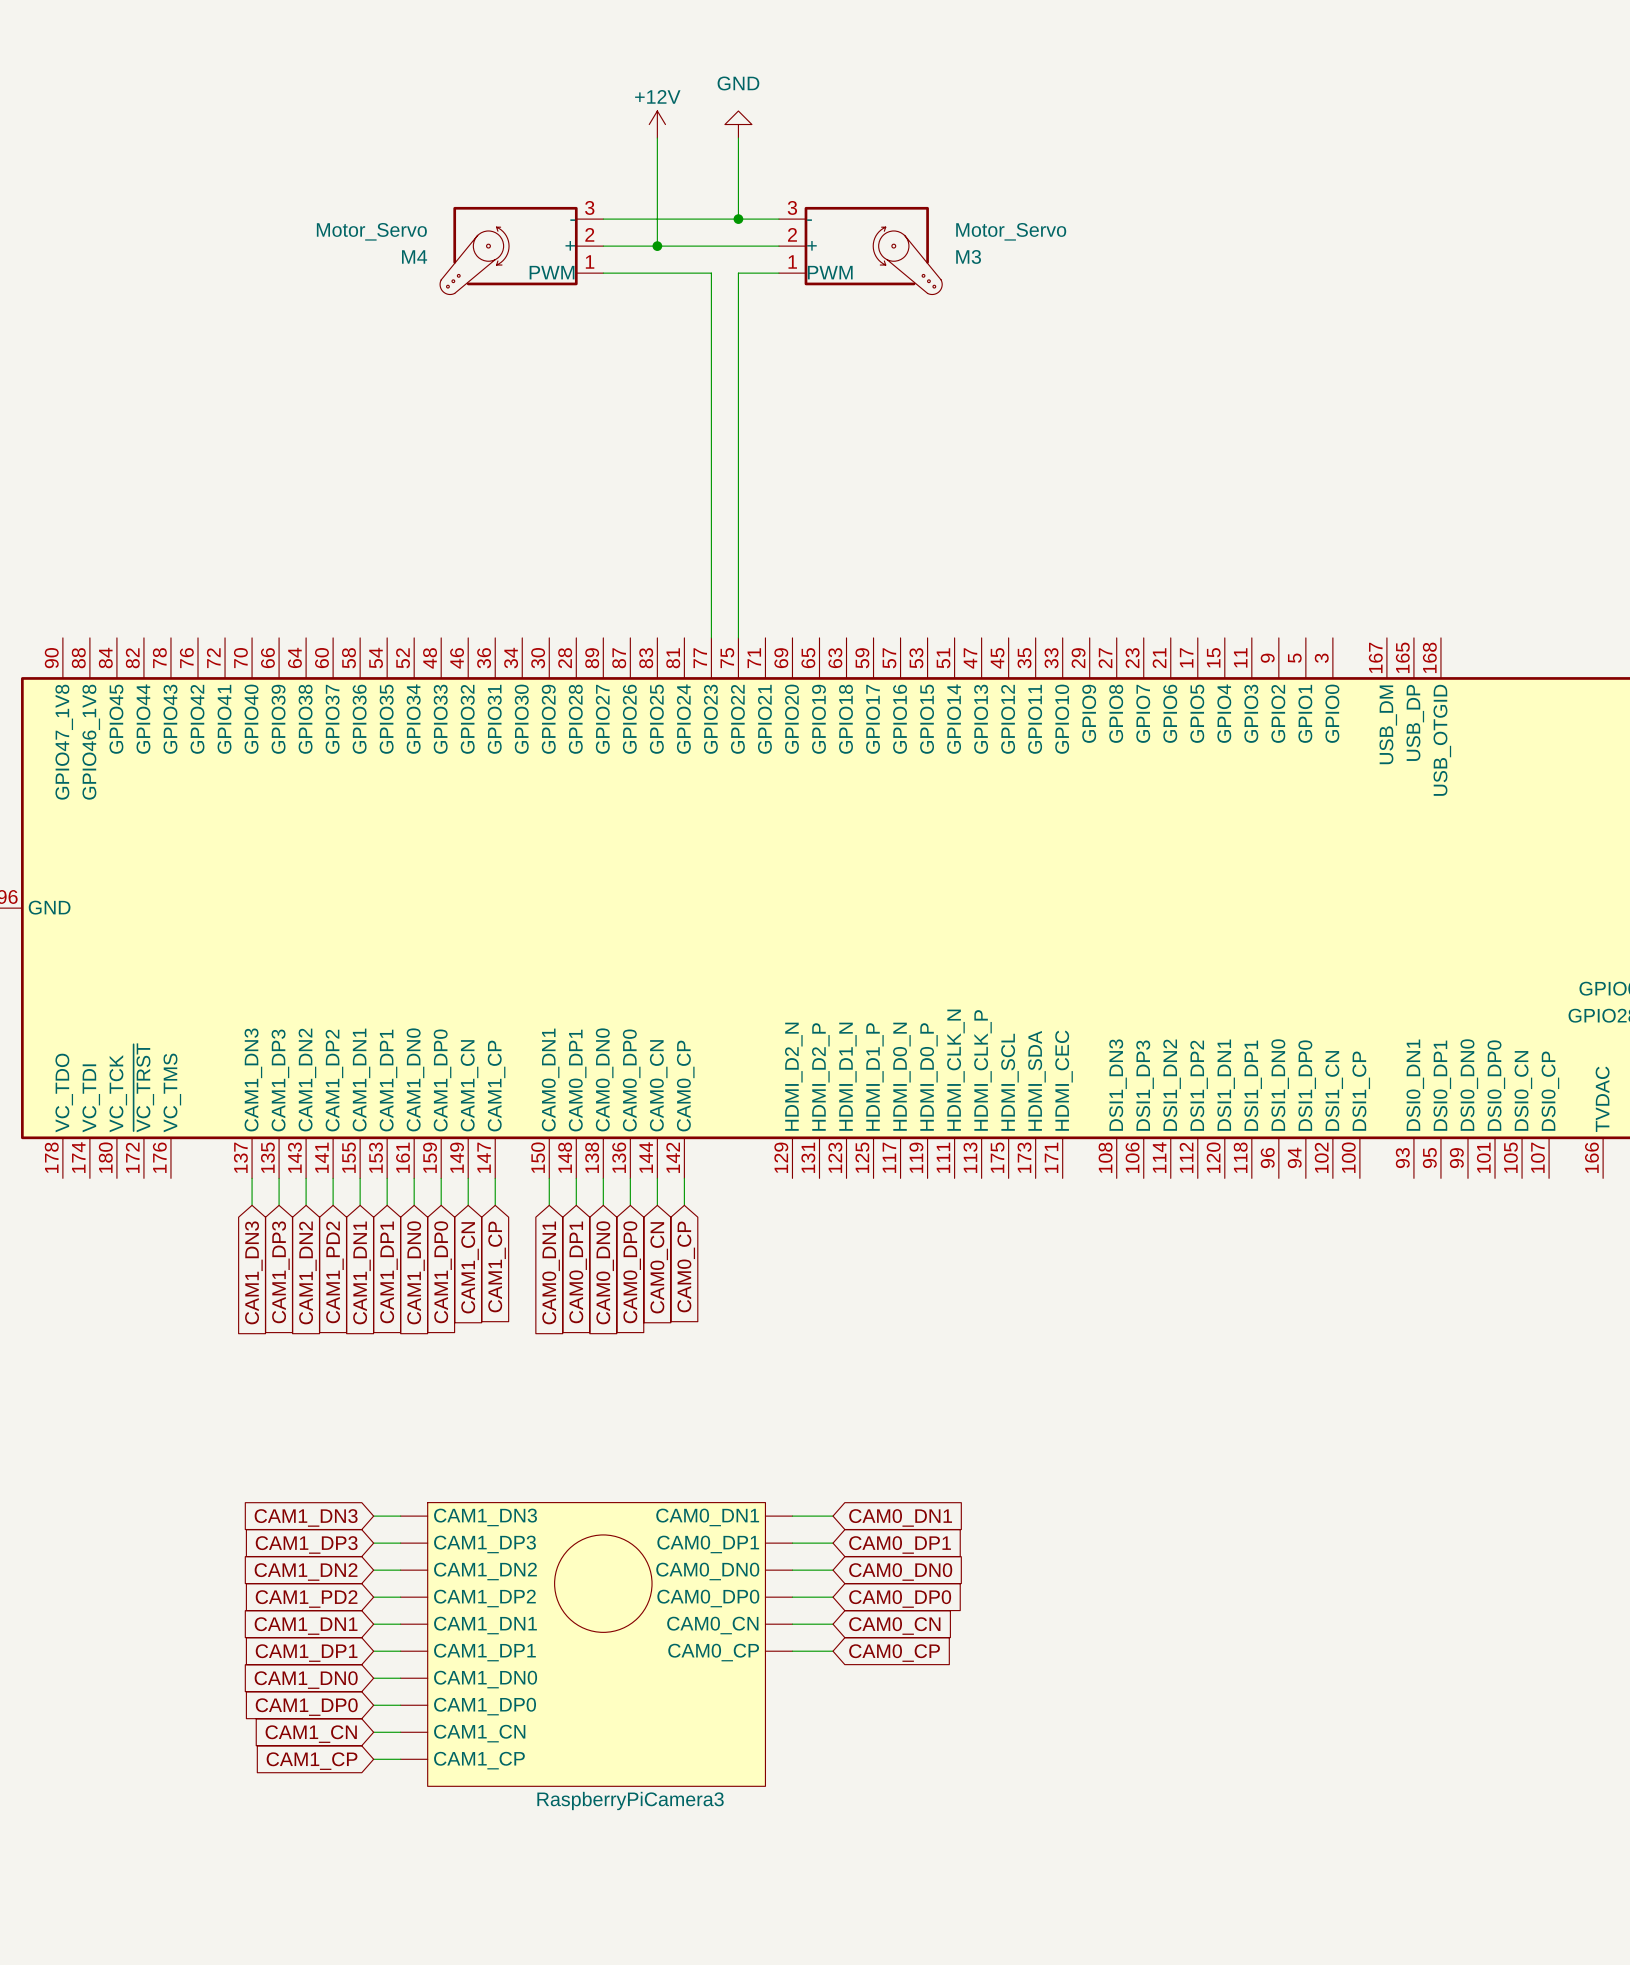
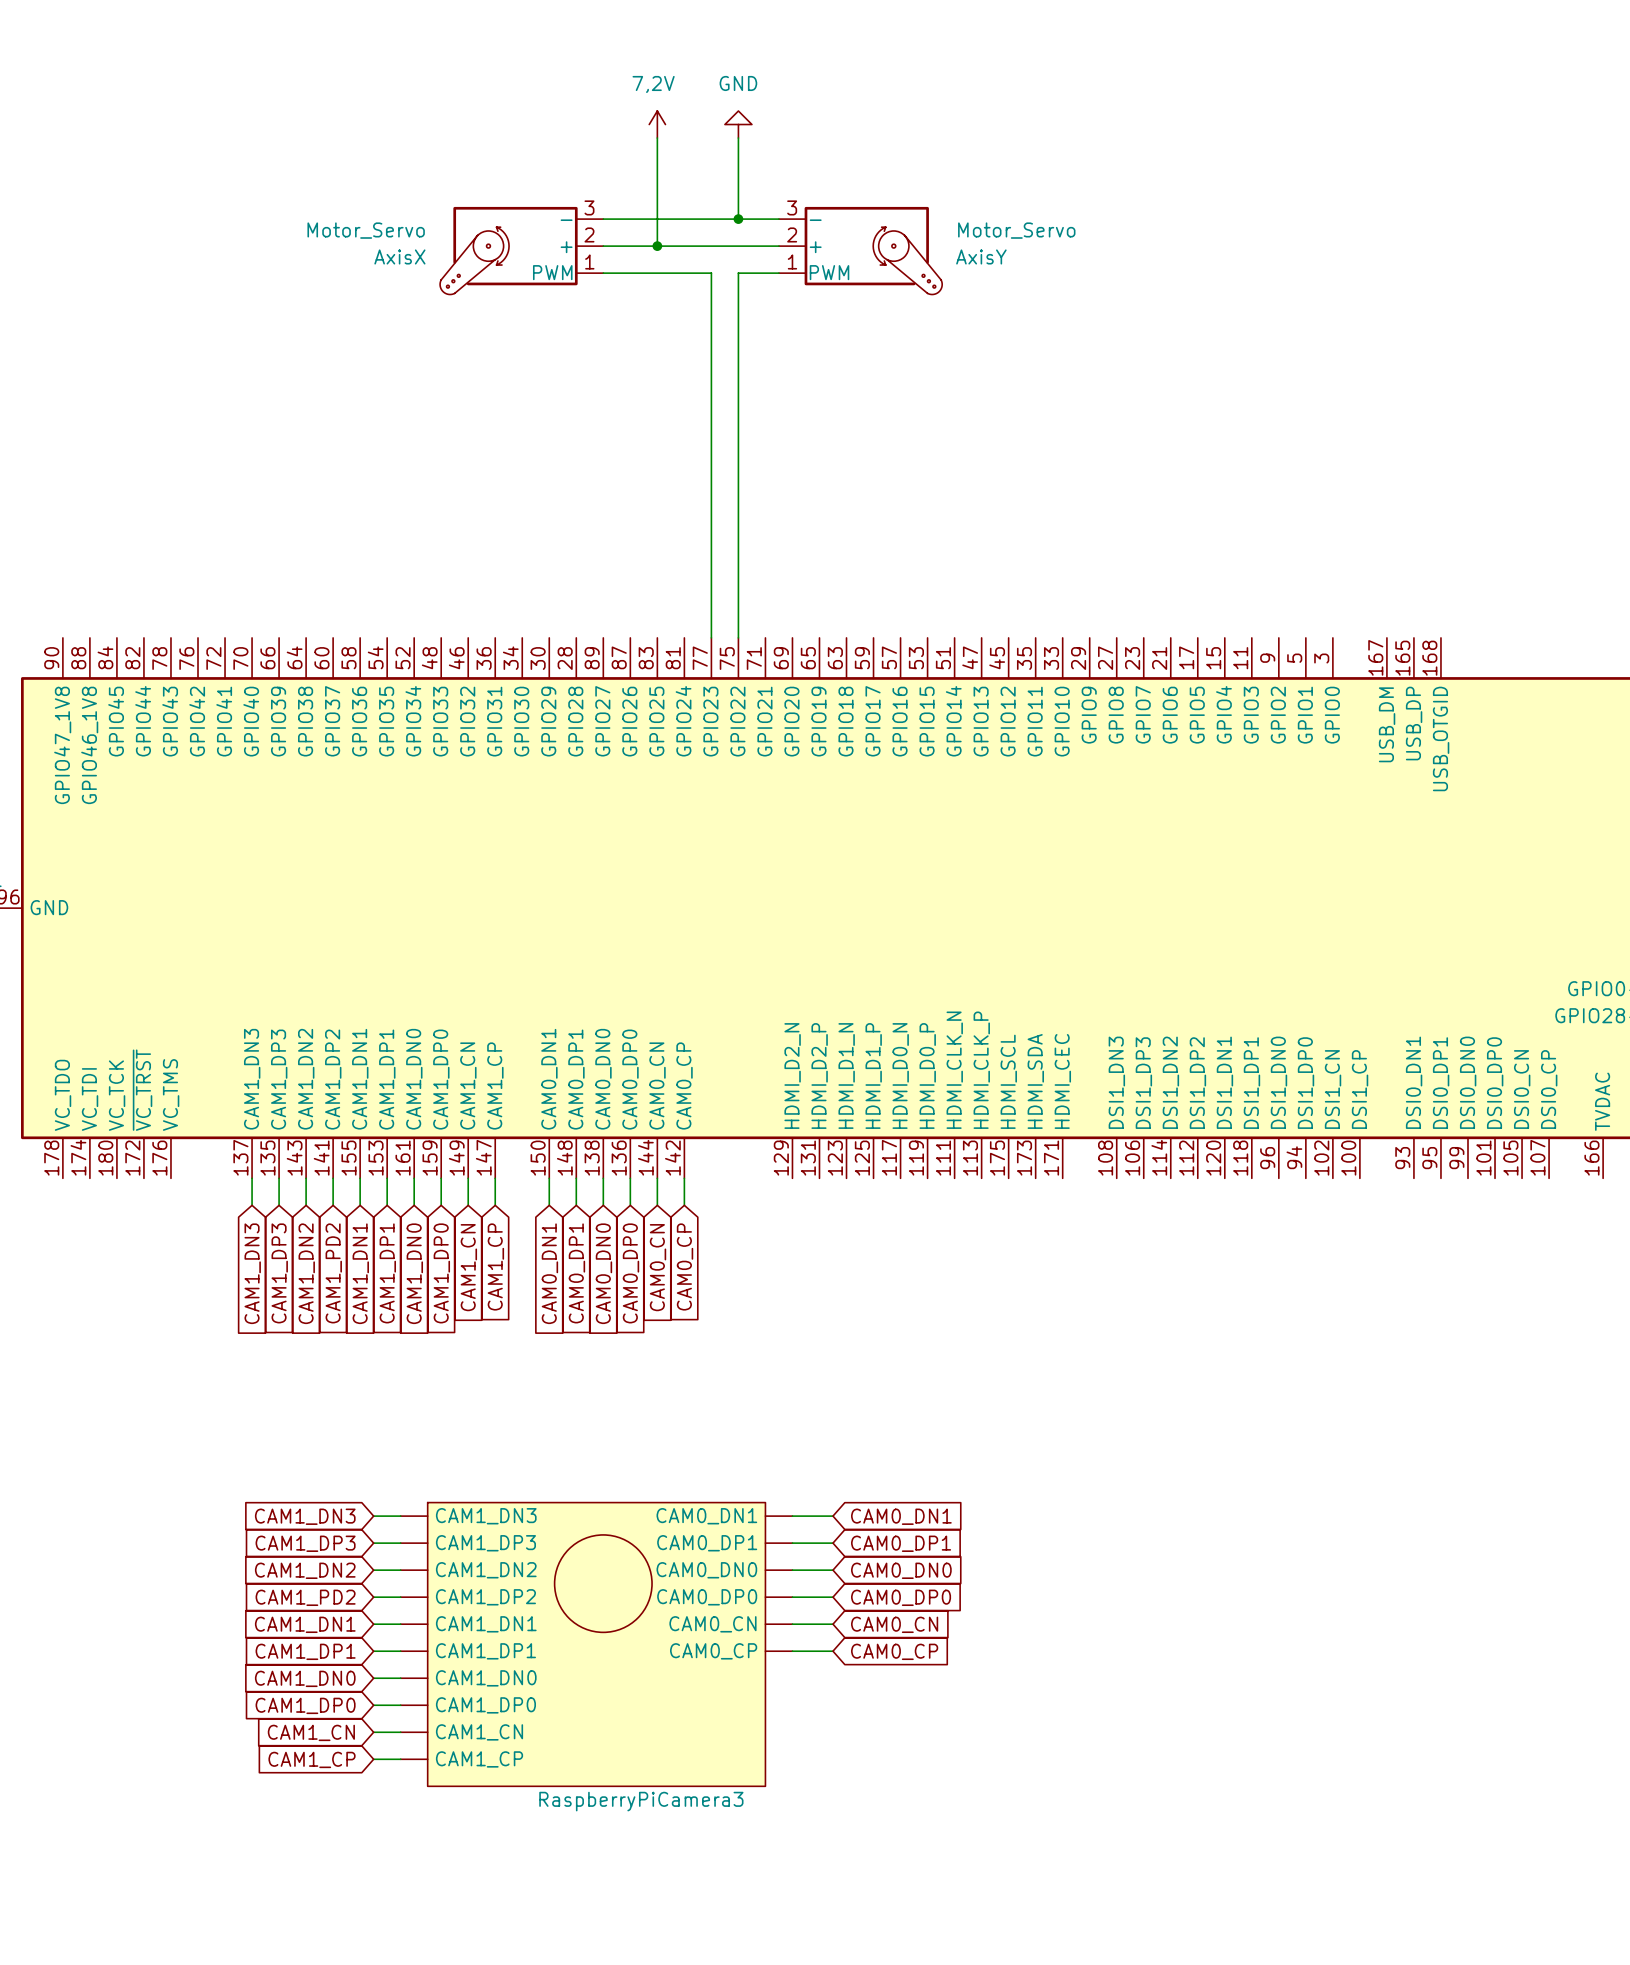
power symbol: +12V (657, 124) -> 7,2V (657, 124)
M4 name: M4 (414, 256) -> AxisX (399, 256)
M3 name: M3 (968, 256) -> AxisY (981, 256)

